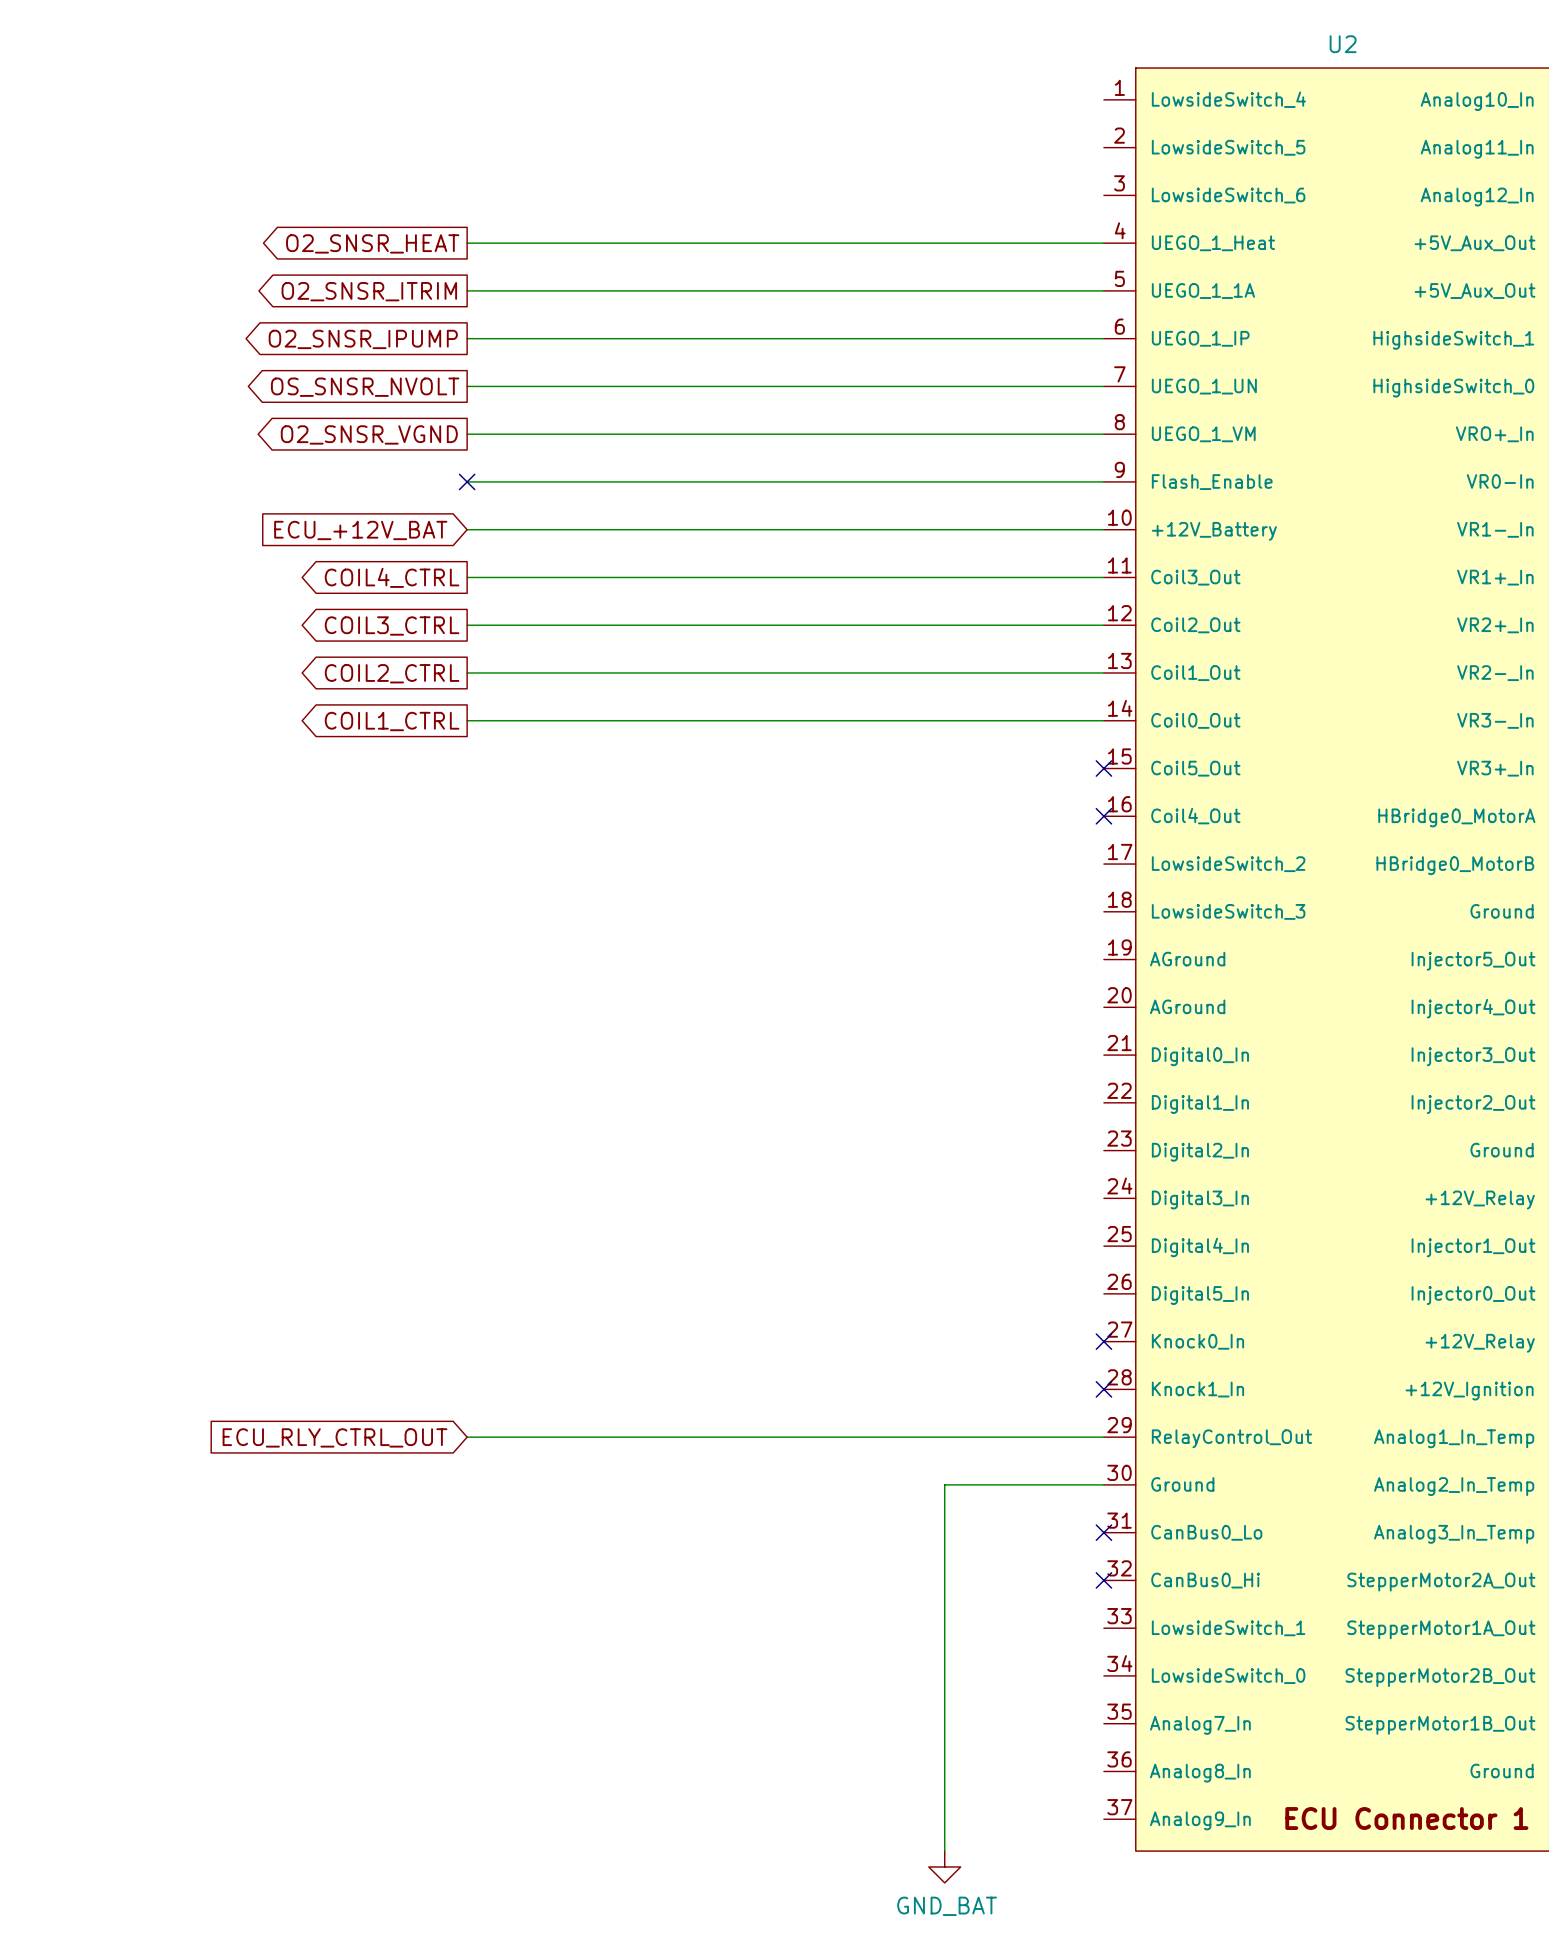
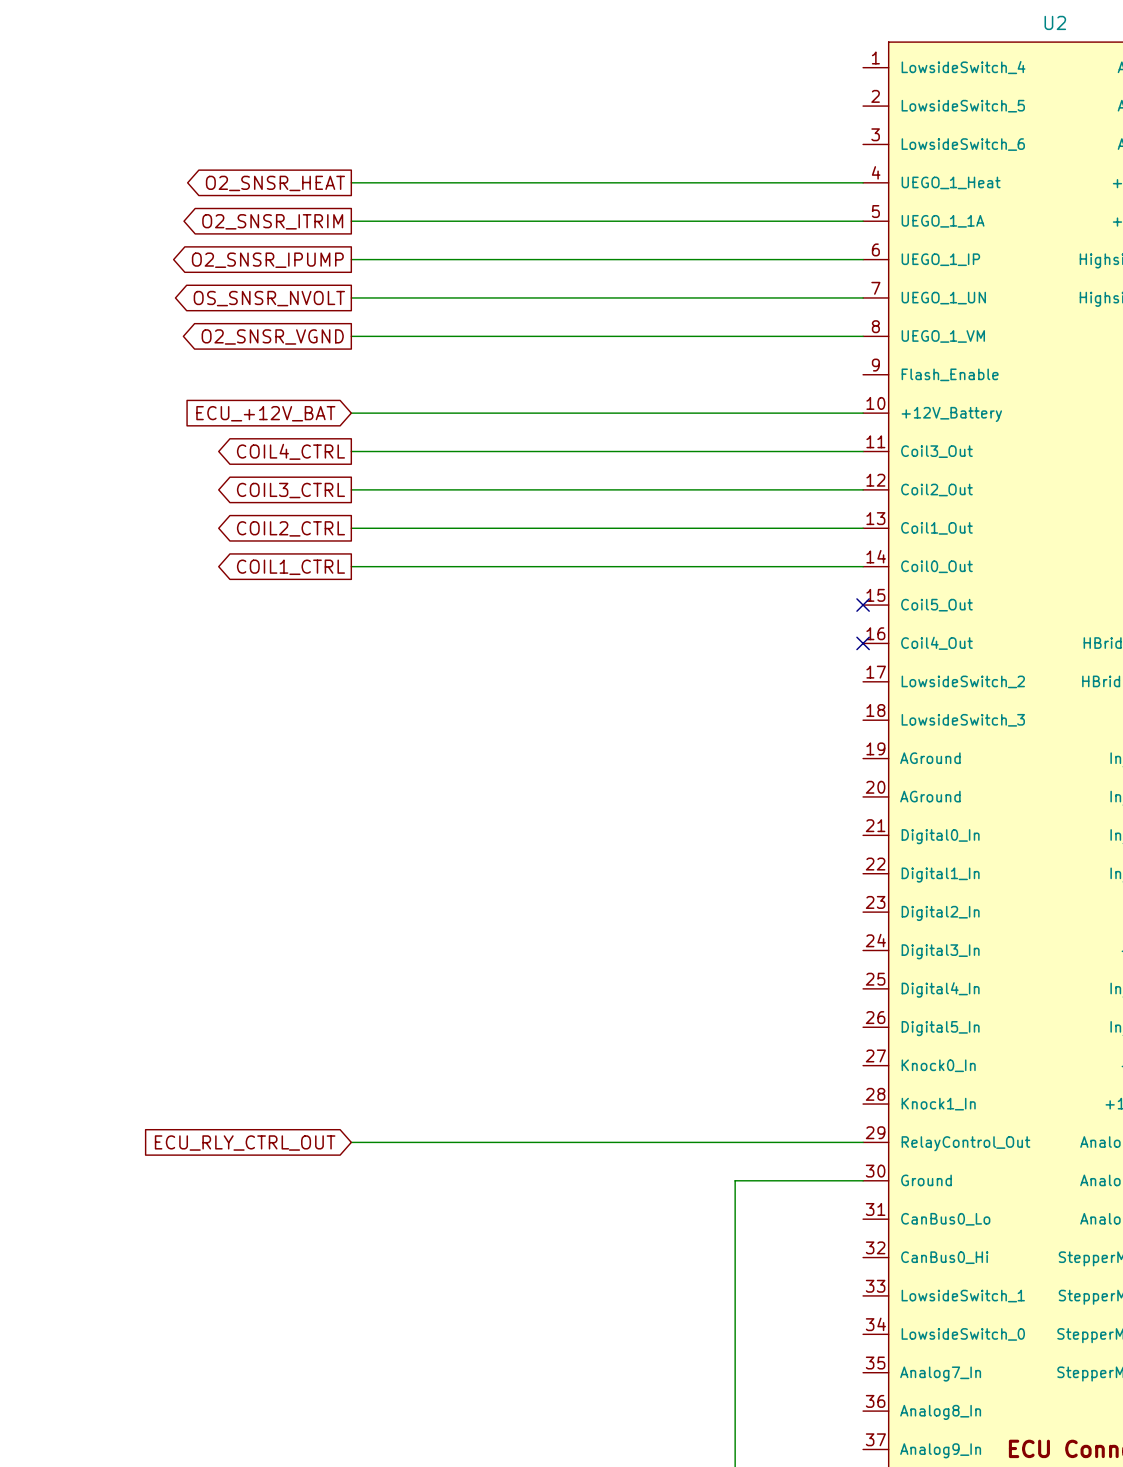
wire: (467, 481) (1103, 481) -> none
no-connect mark: (467, 481) -> none
no-connect mark: (1103, 1341) -> none
no-connect mark: (1103, 1389) -> none
no-connect mark: (1103, 1532) -> none
no-connect mark: (1103, 1580) -> none

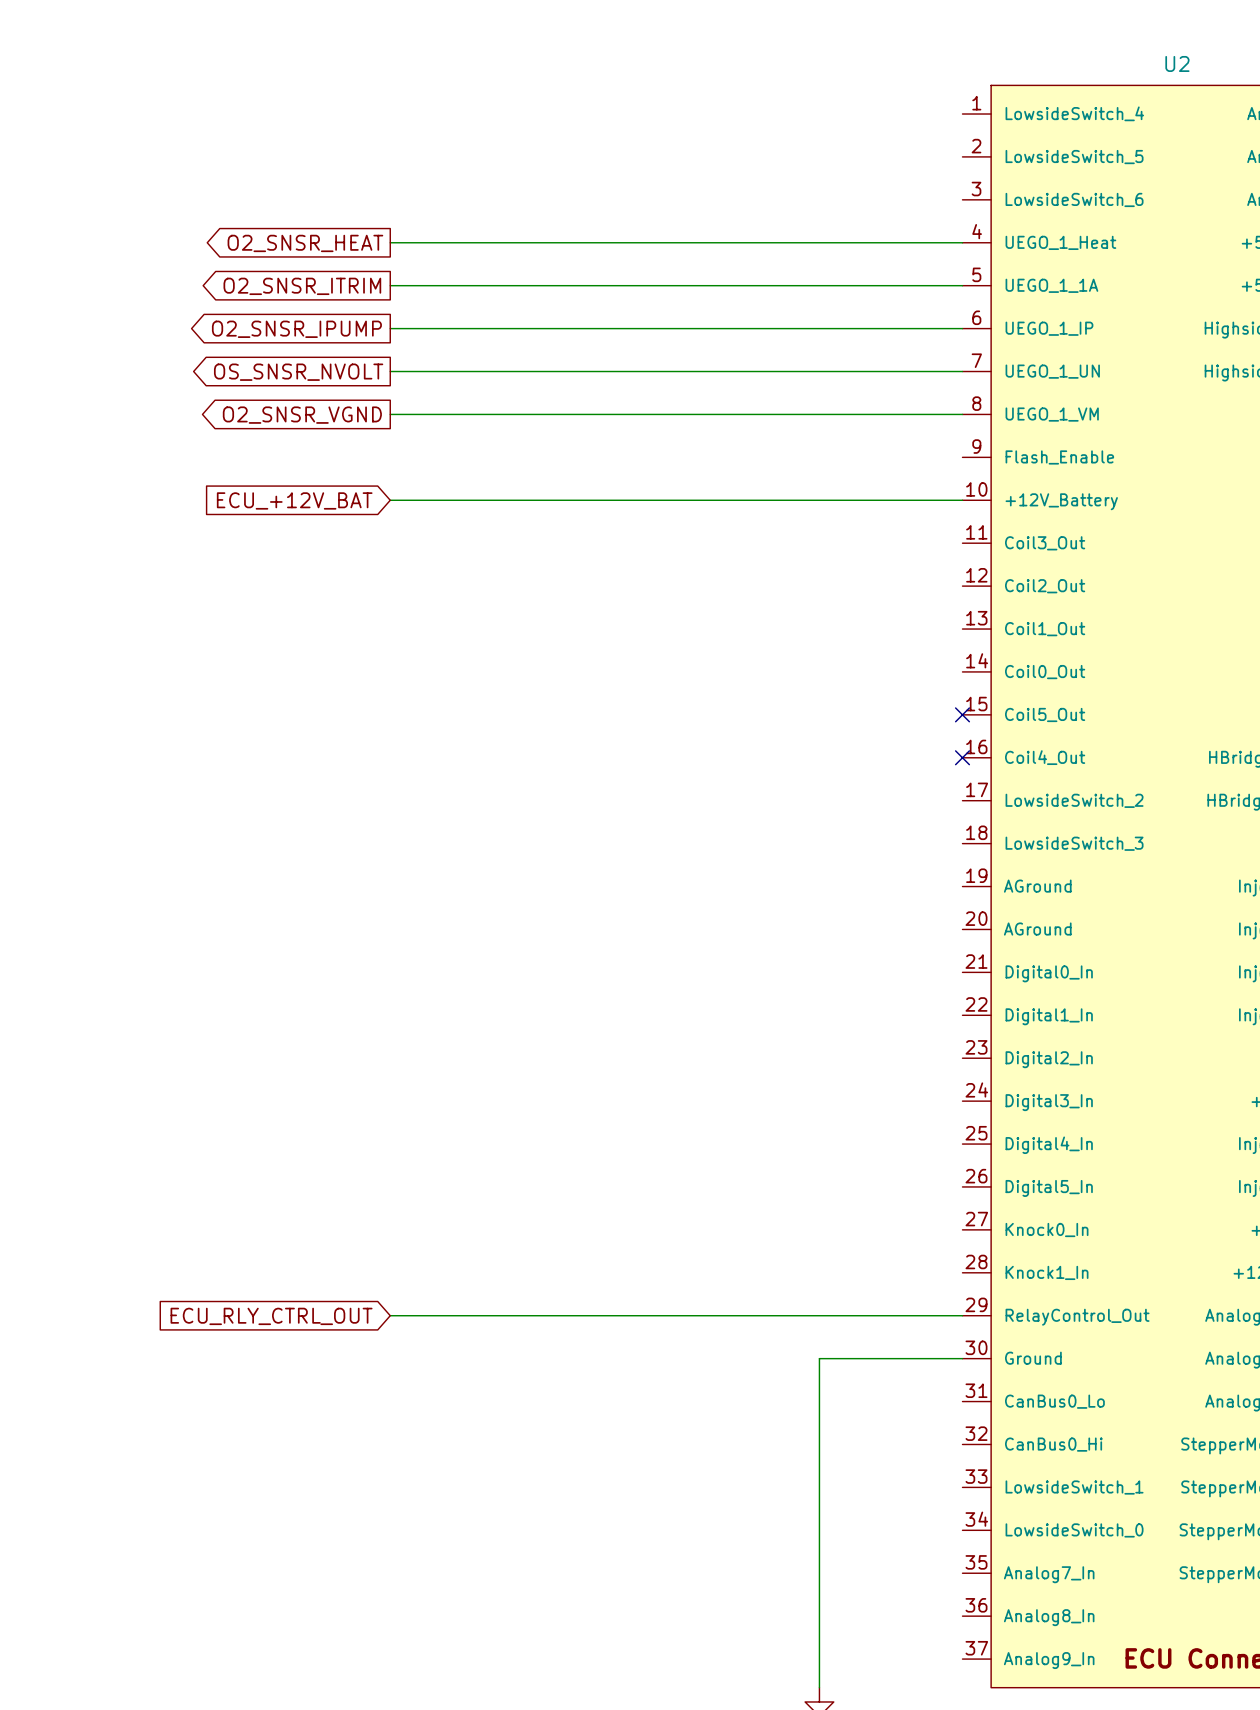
global label: COIL4_CTRL (290, 451) -> none
wire: (351, 451) (863, 451) -> none
wire: (351, 489) (863, 489) -> none
global label: COIL3_CTRL (290, 490) -> none
global label: COIL2_CTRL (290, 528) -> none
wire: (351, 528) (863, 528) -> none
wire: (351, 566) (863, 566) -> none
global label: COIL1_CTRL (290, 567) -> none

